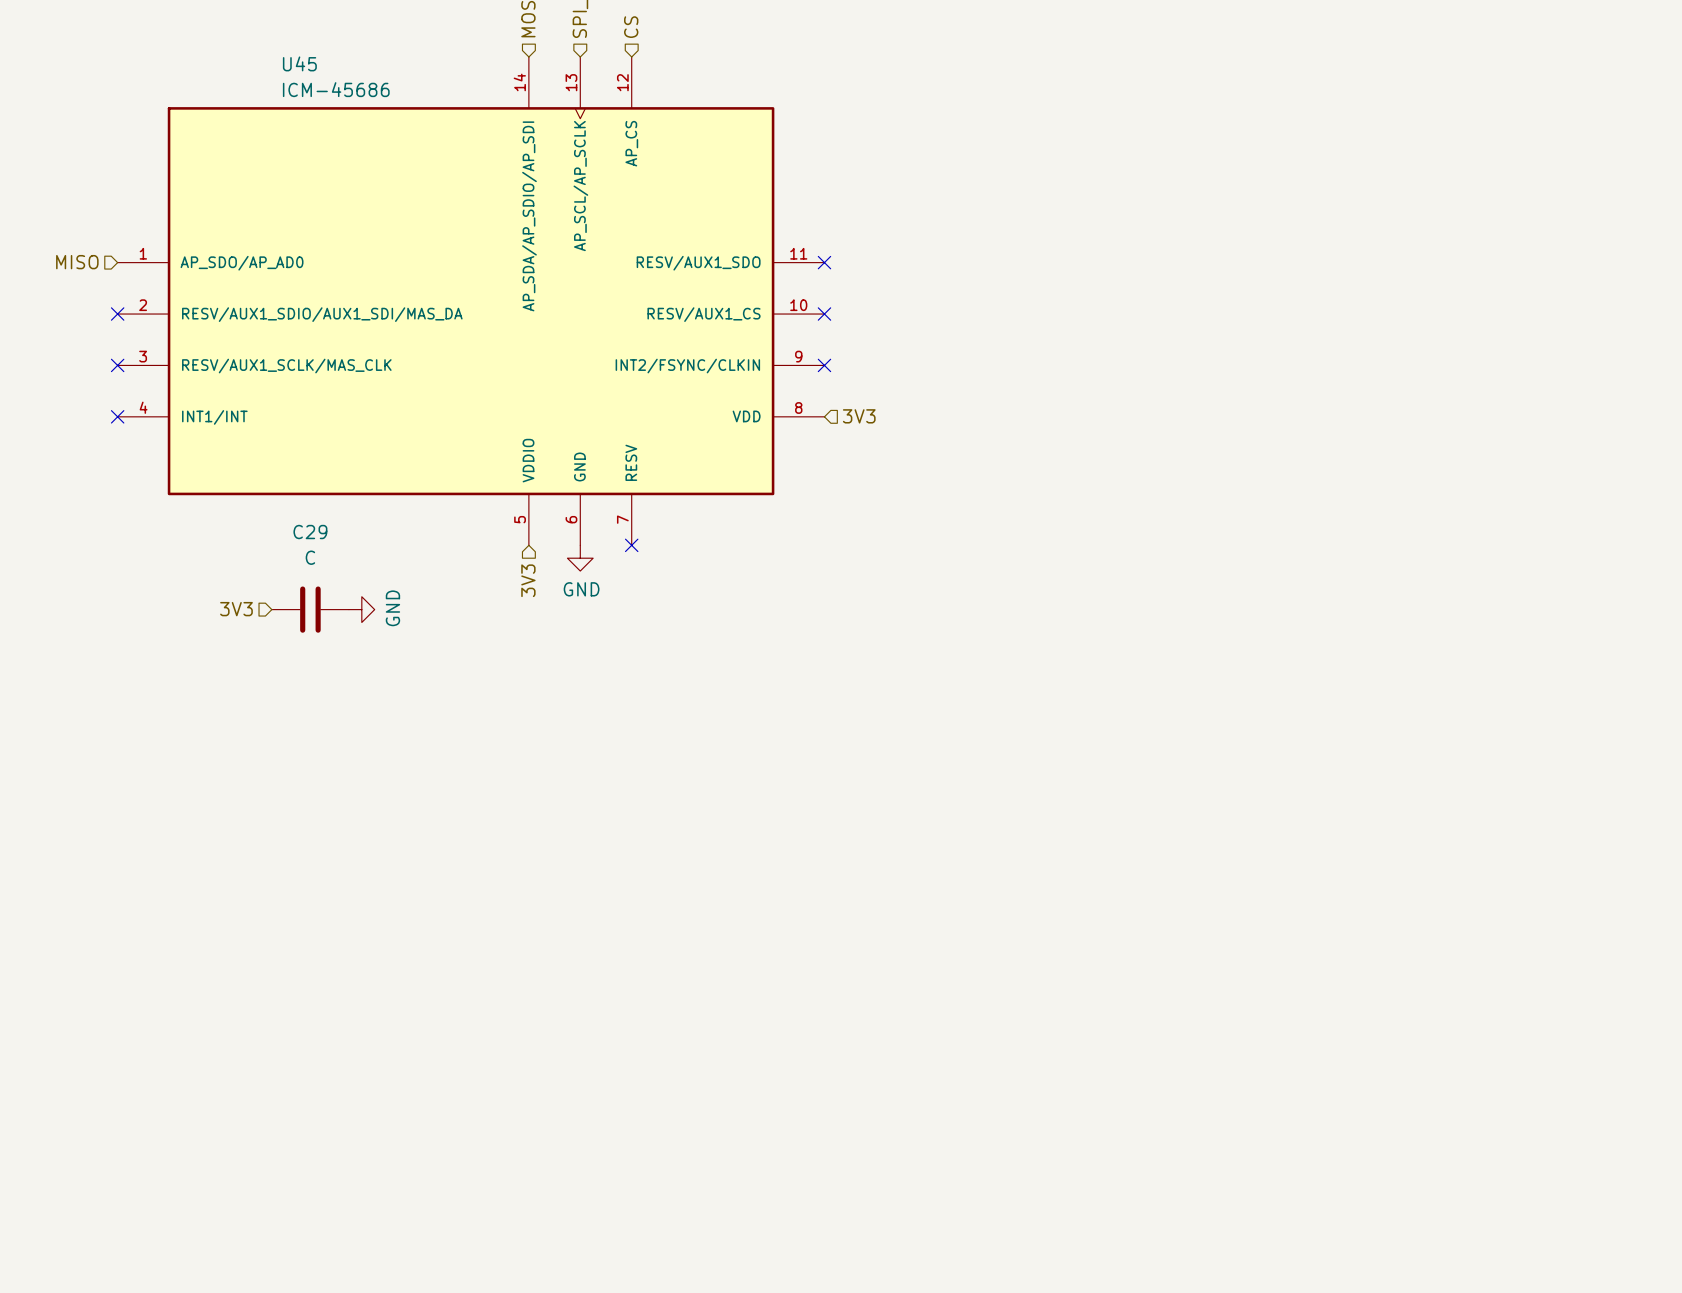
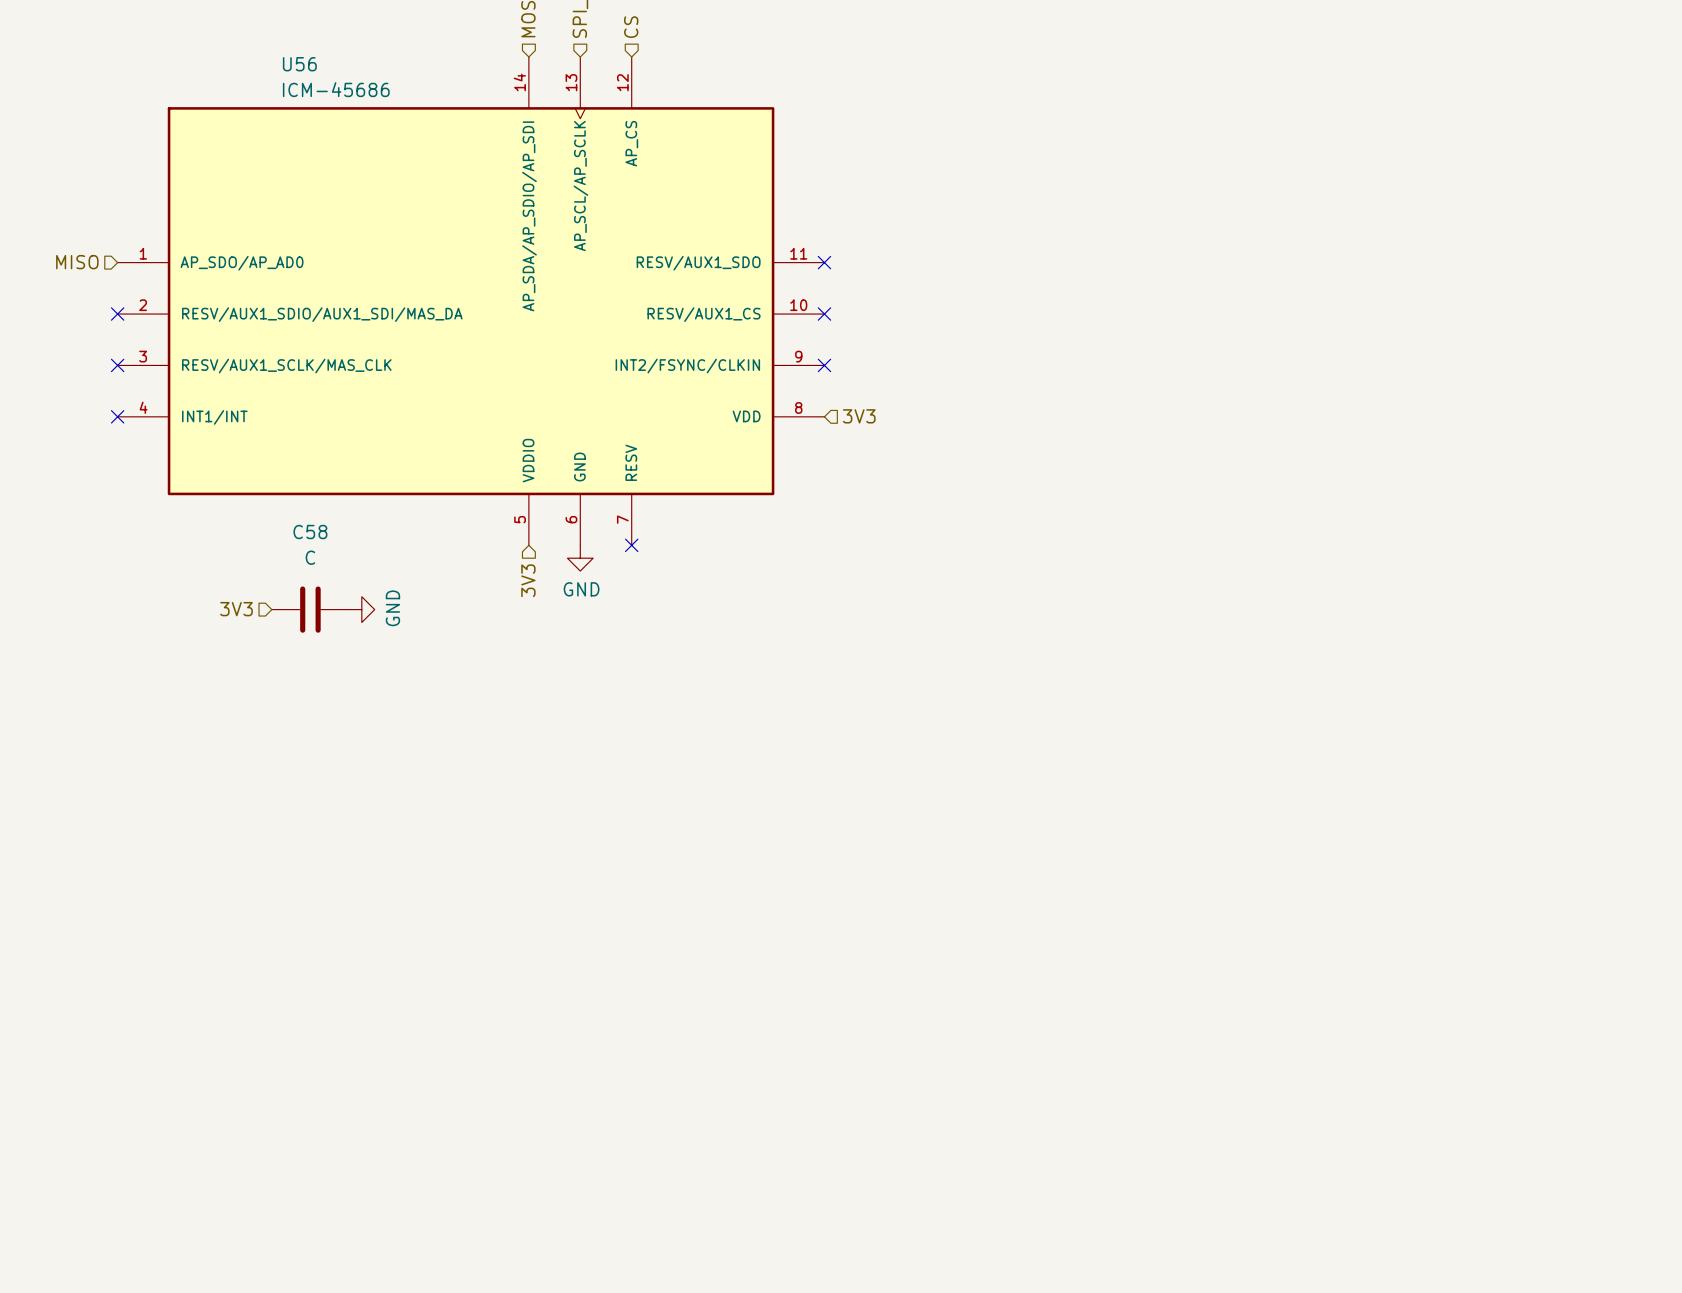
U45 name: U45 (299, 63) -> U56 (299, 64)
C29 name: C29 (310, 532) -> C58 (310, 532)

